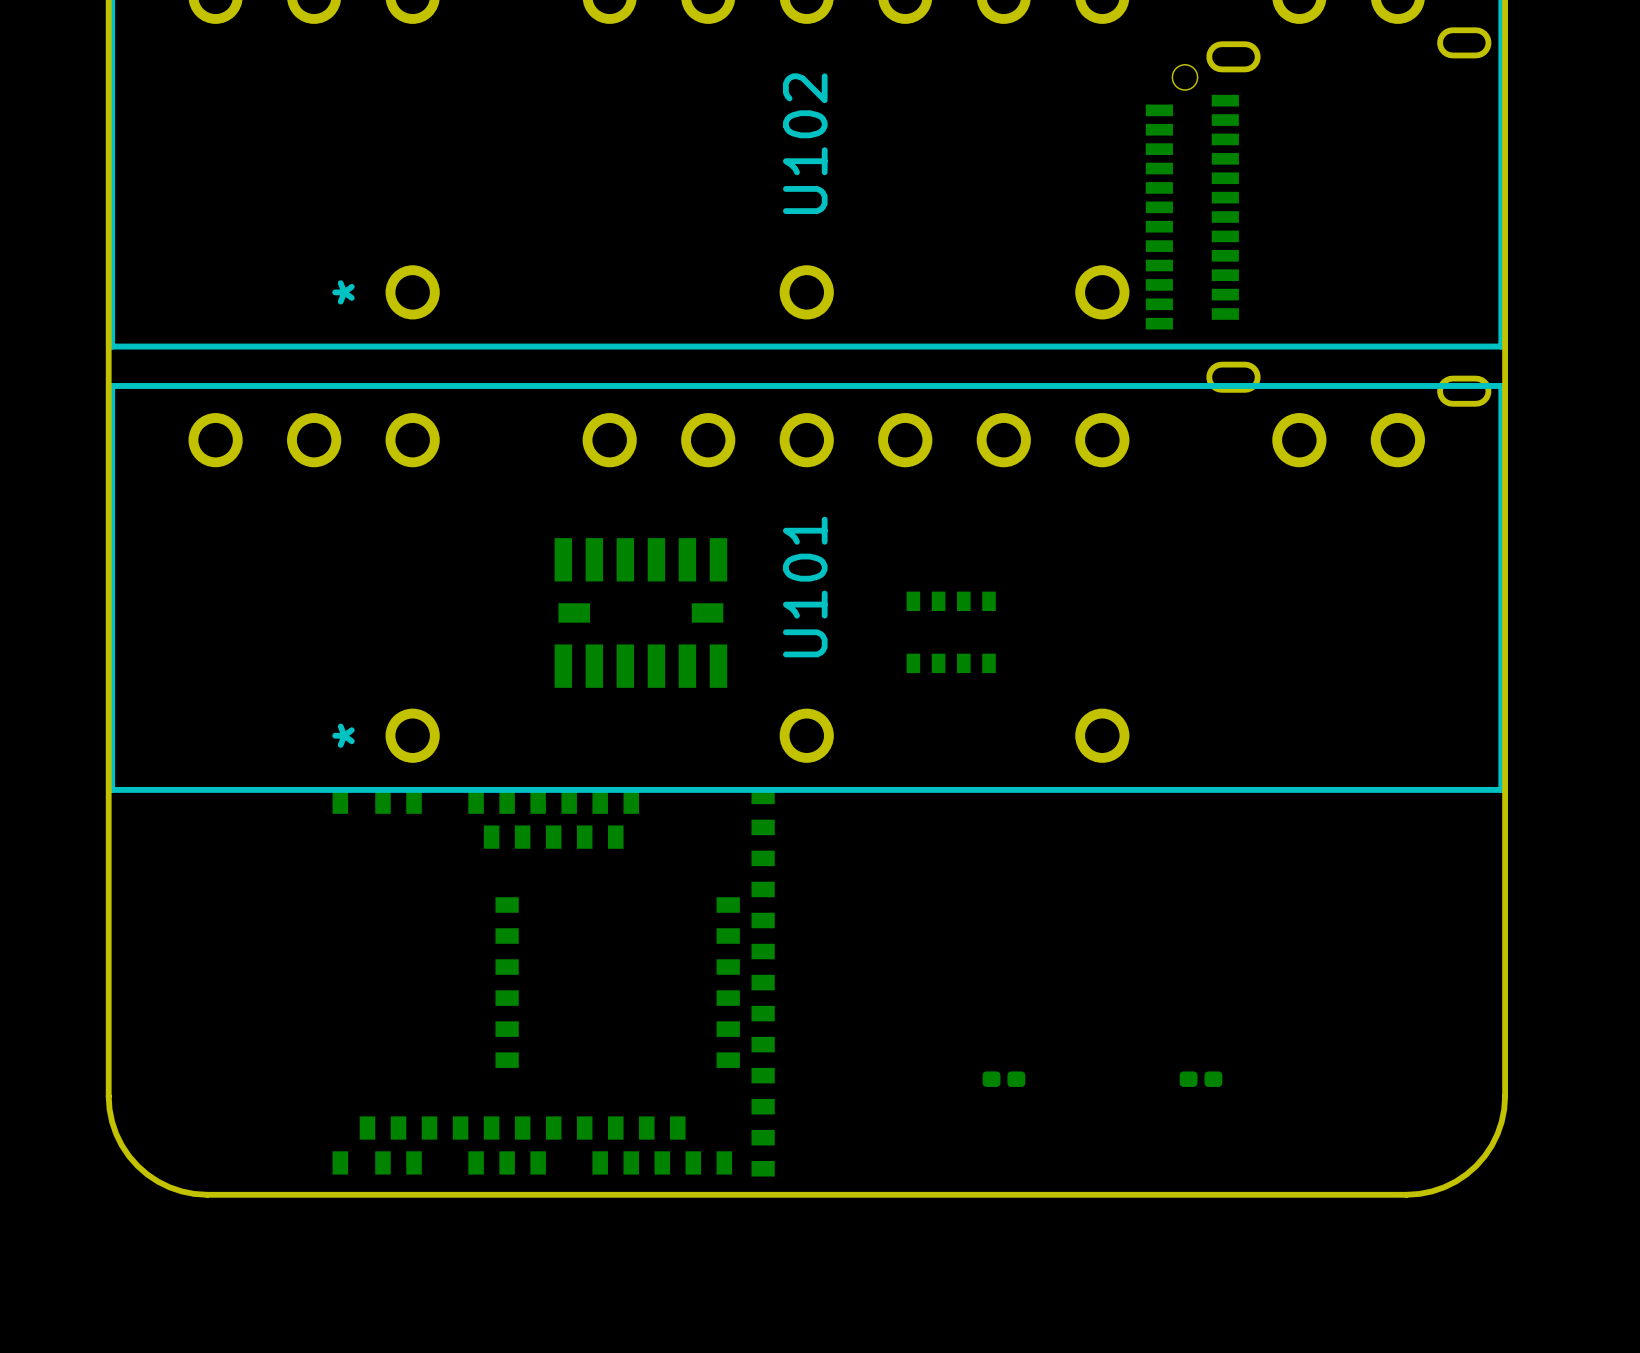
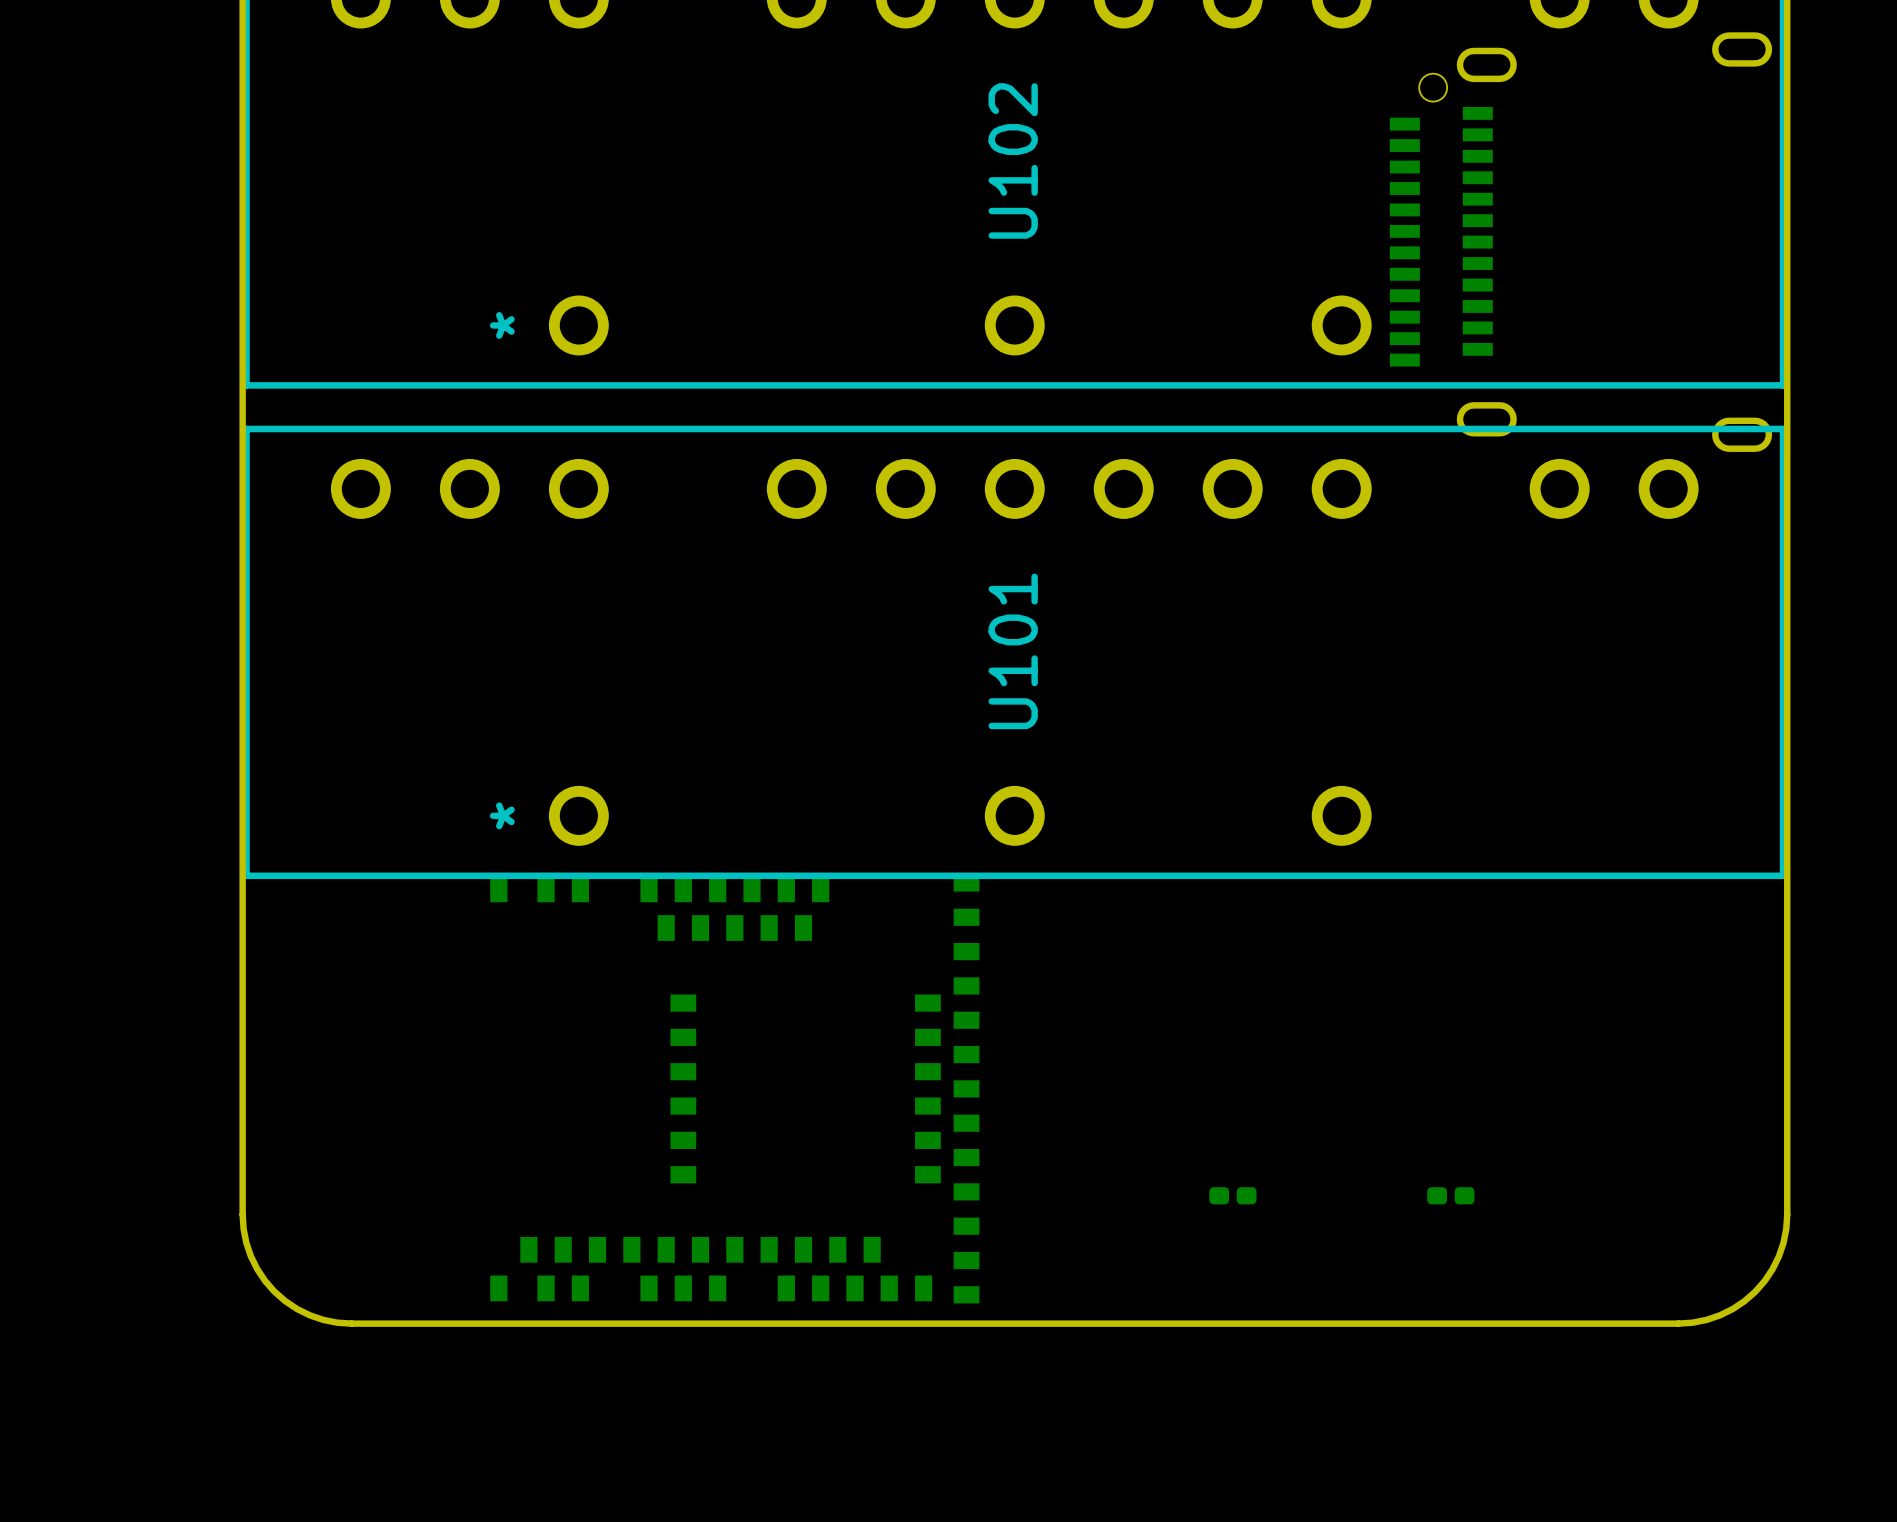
part: (640, 612) -> none
part: (951, 632) -> none

